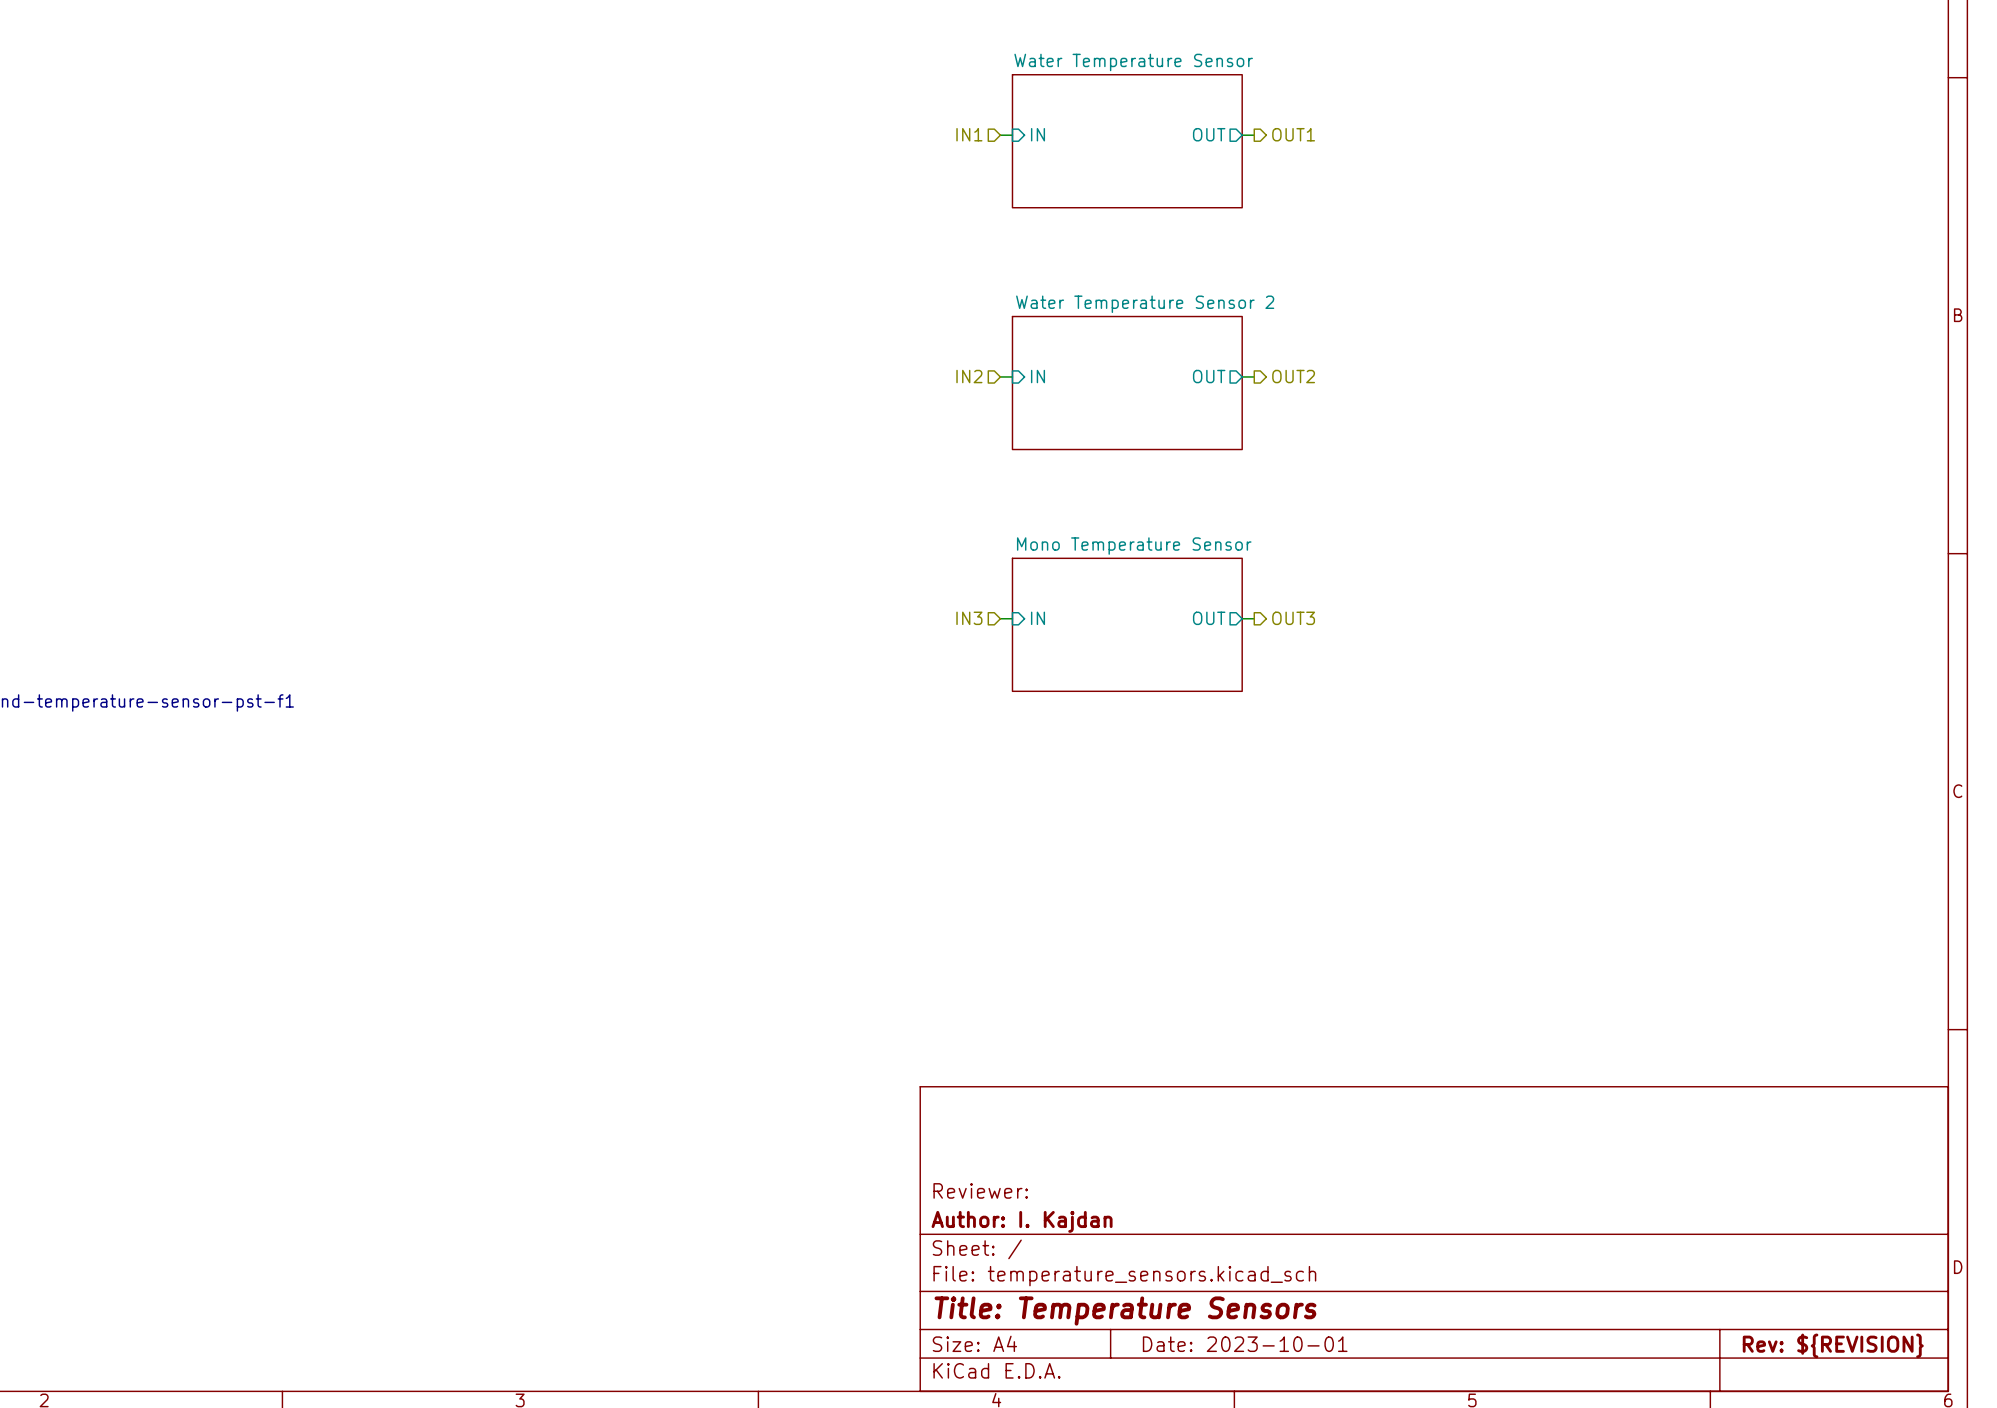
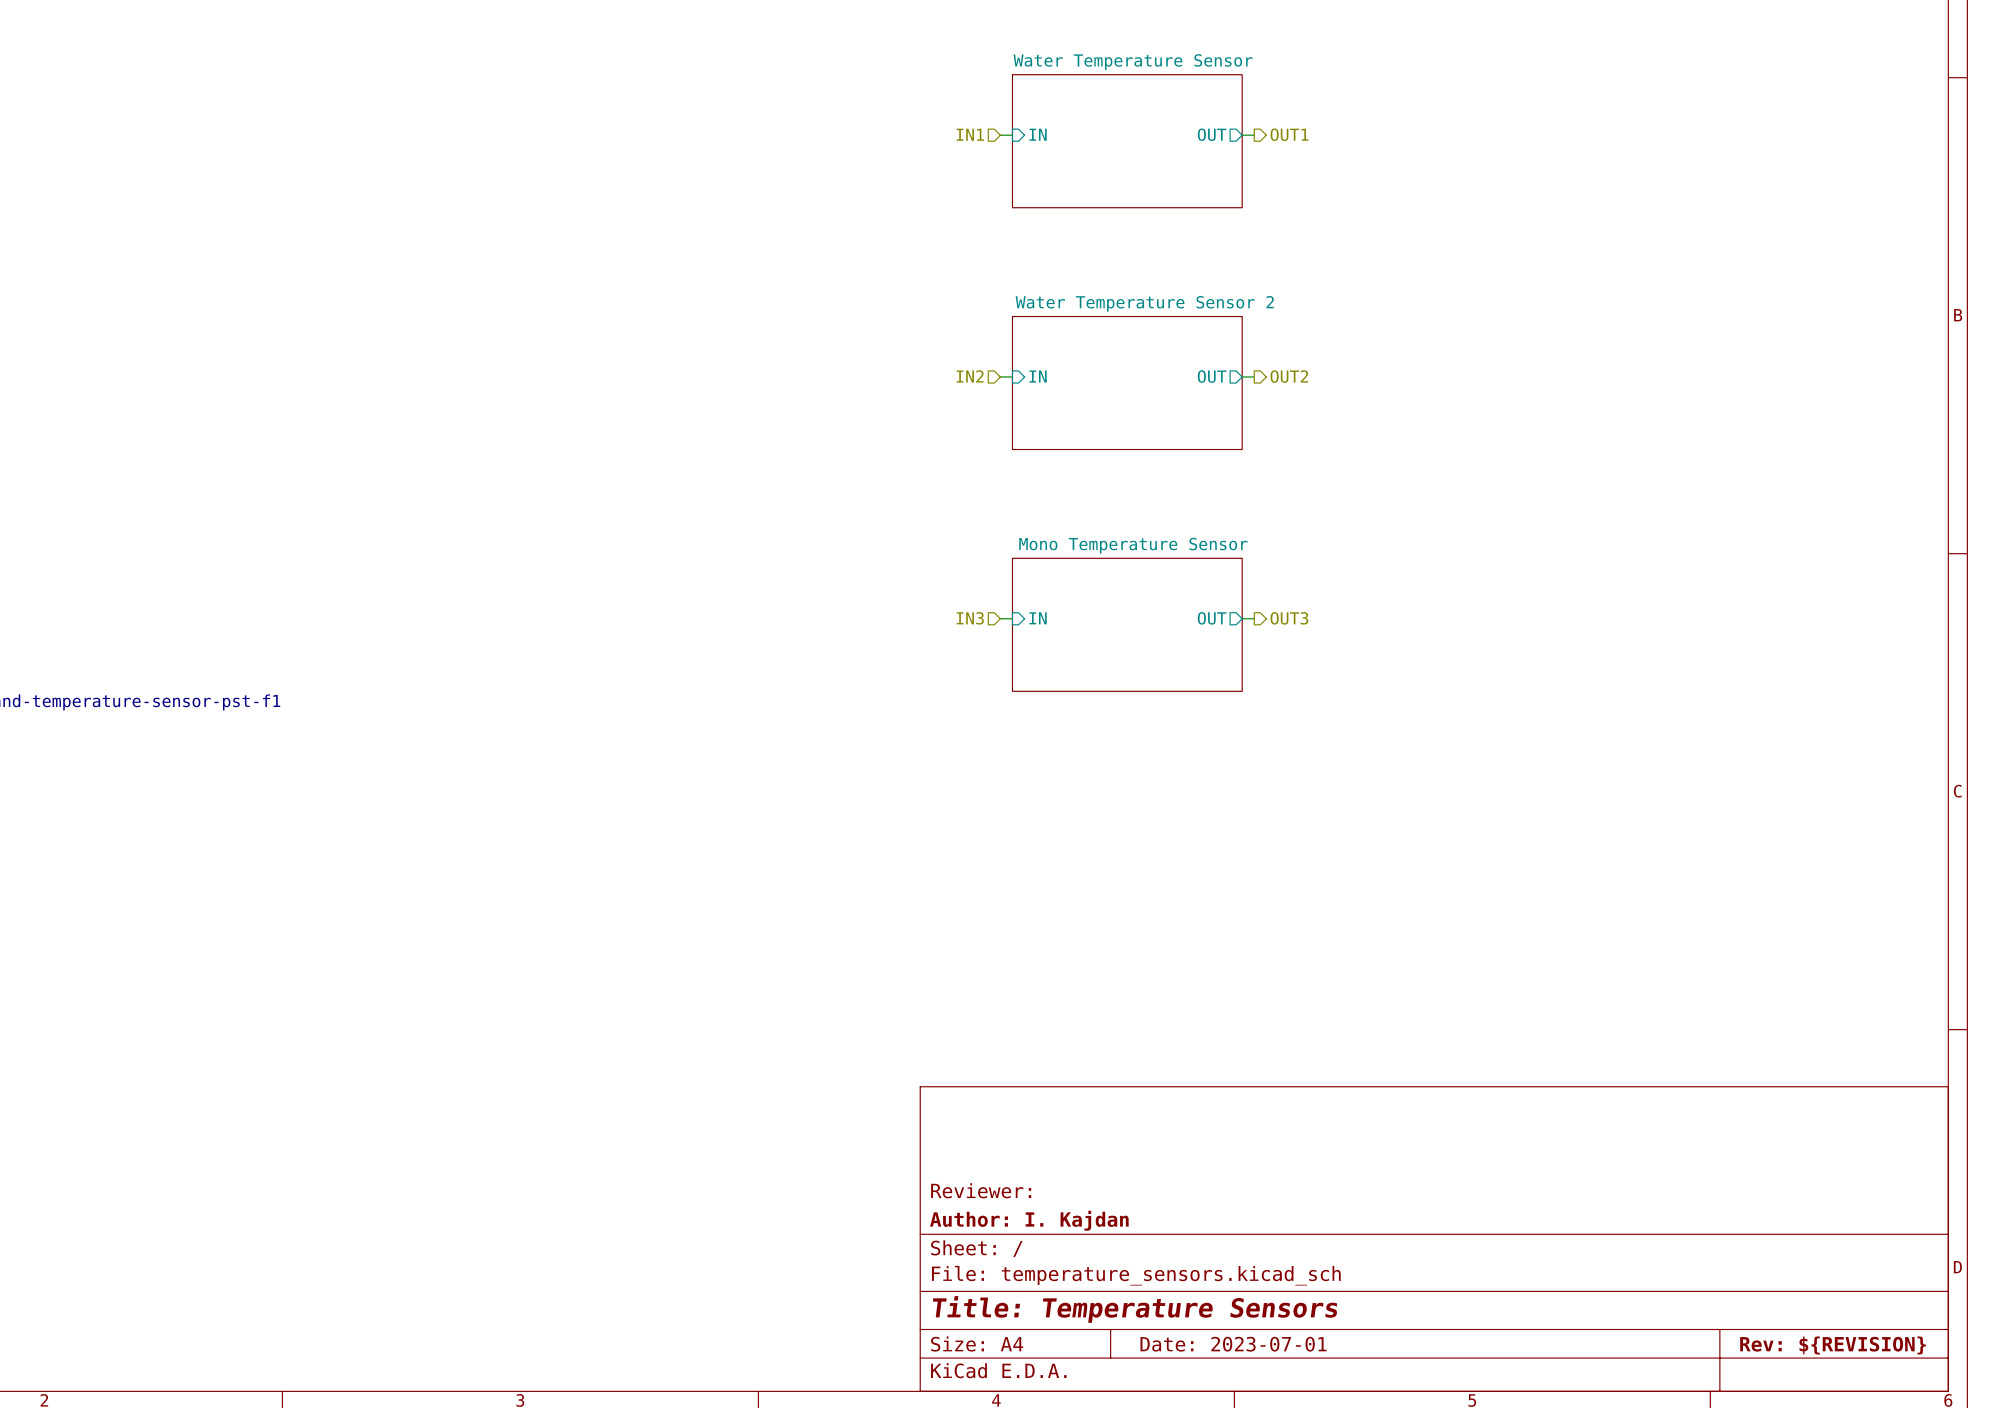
title block: Date: 2023-10-01 (1245, 1344) -> Date: 2023-07-01 (1233, 1344)

